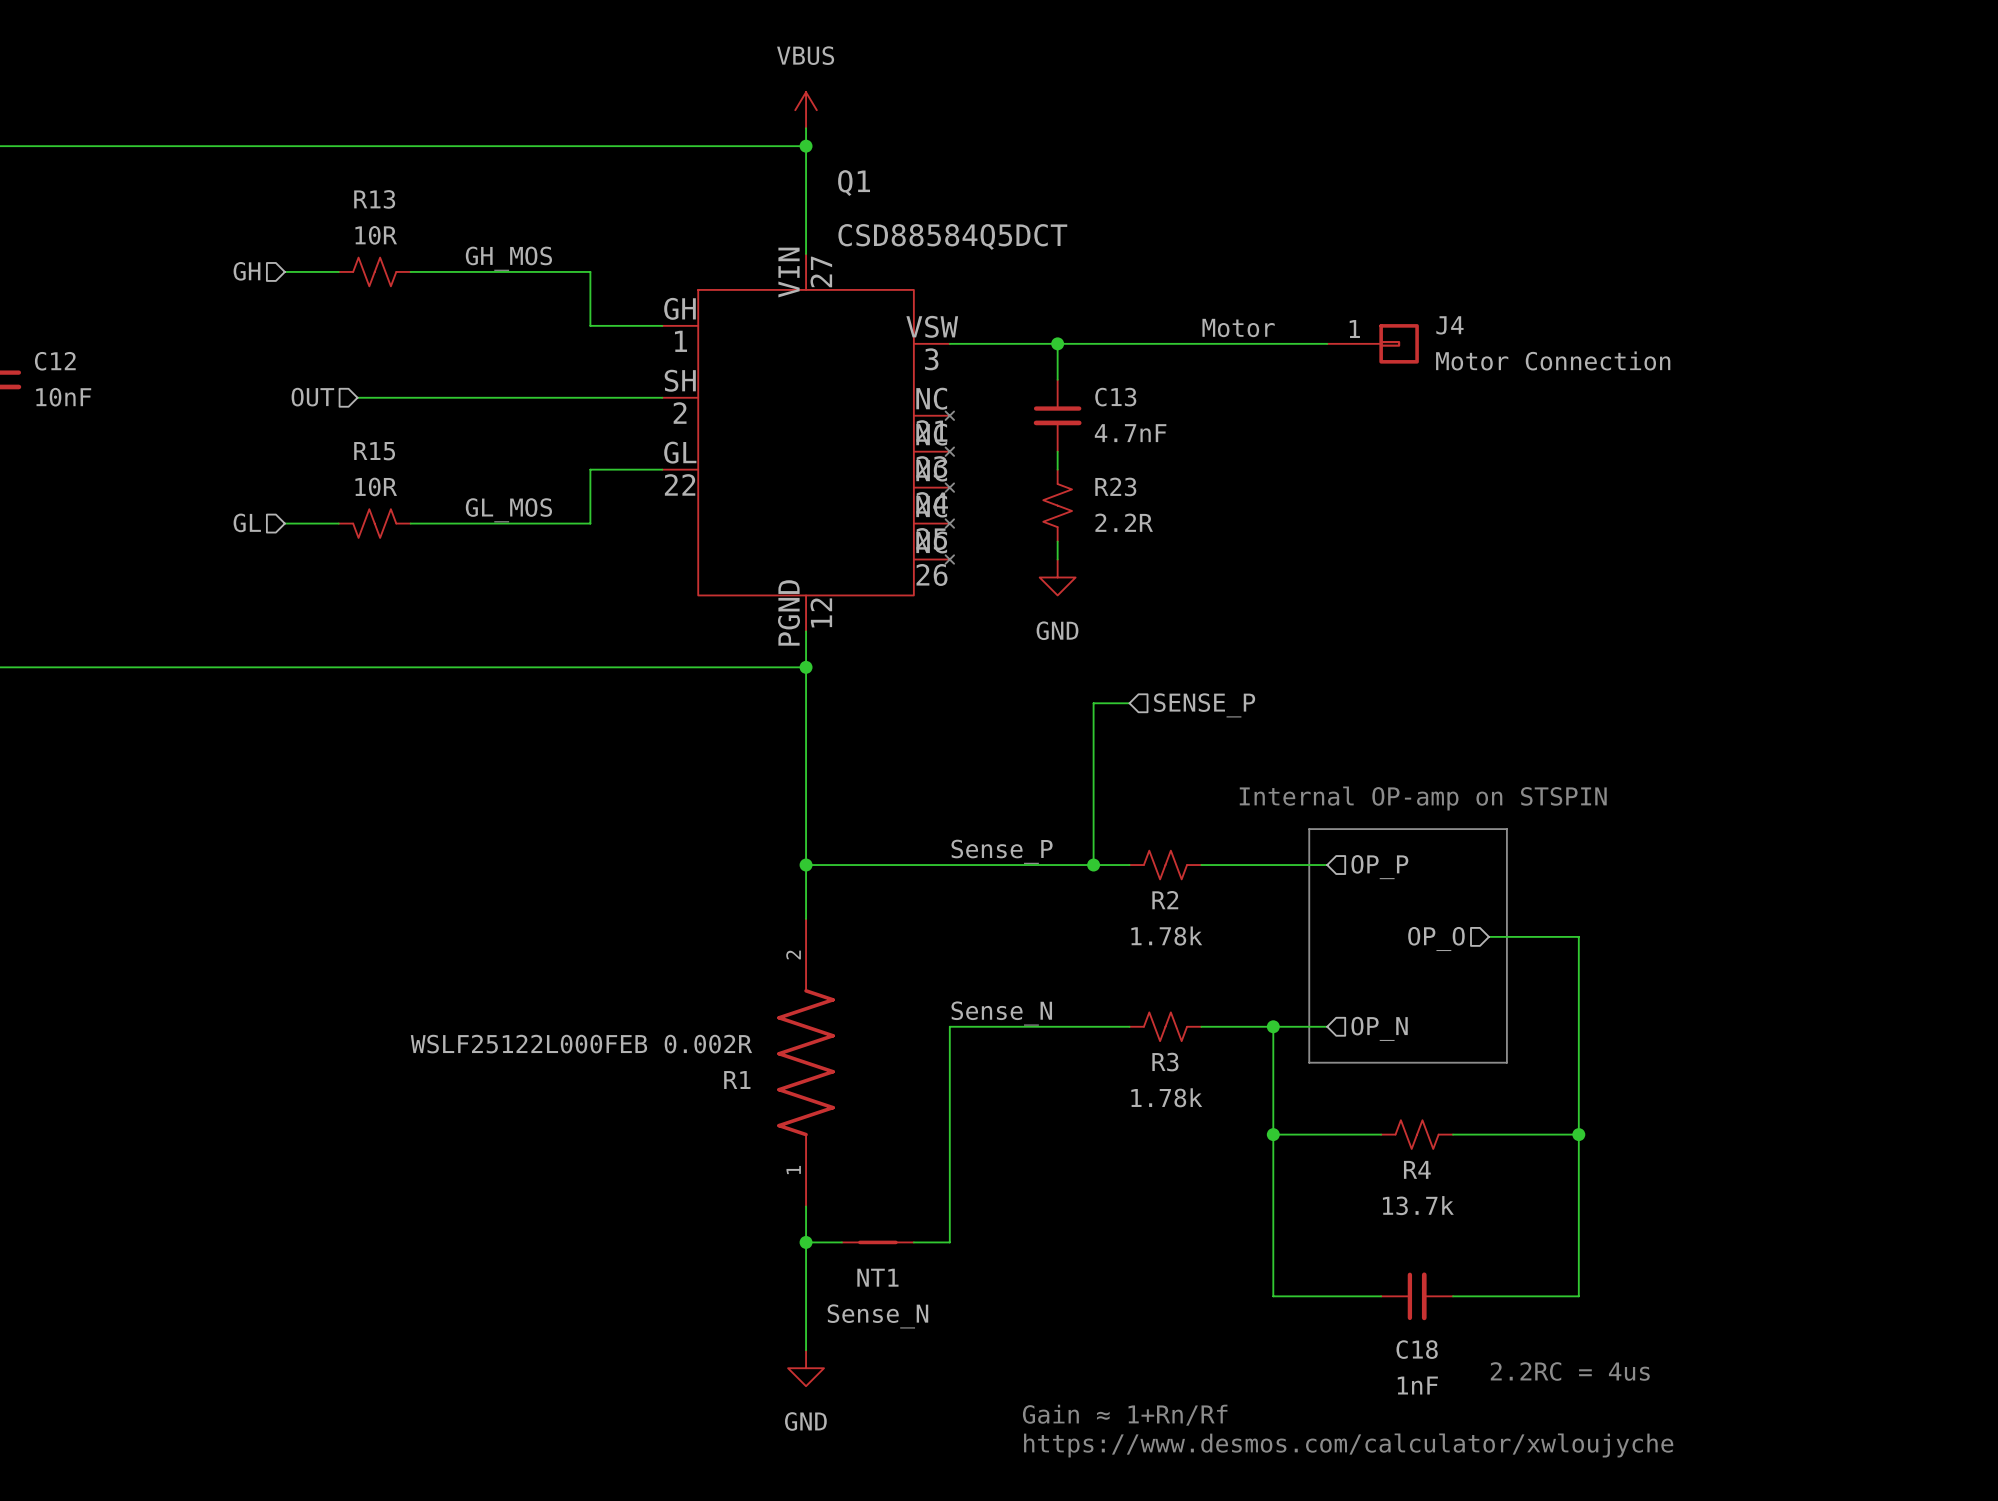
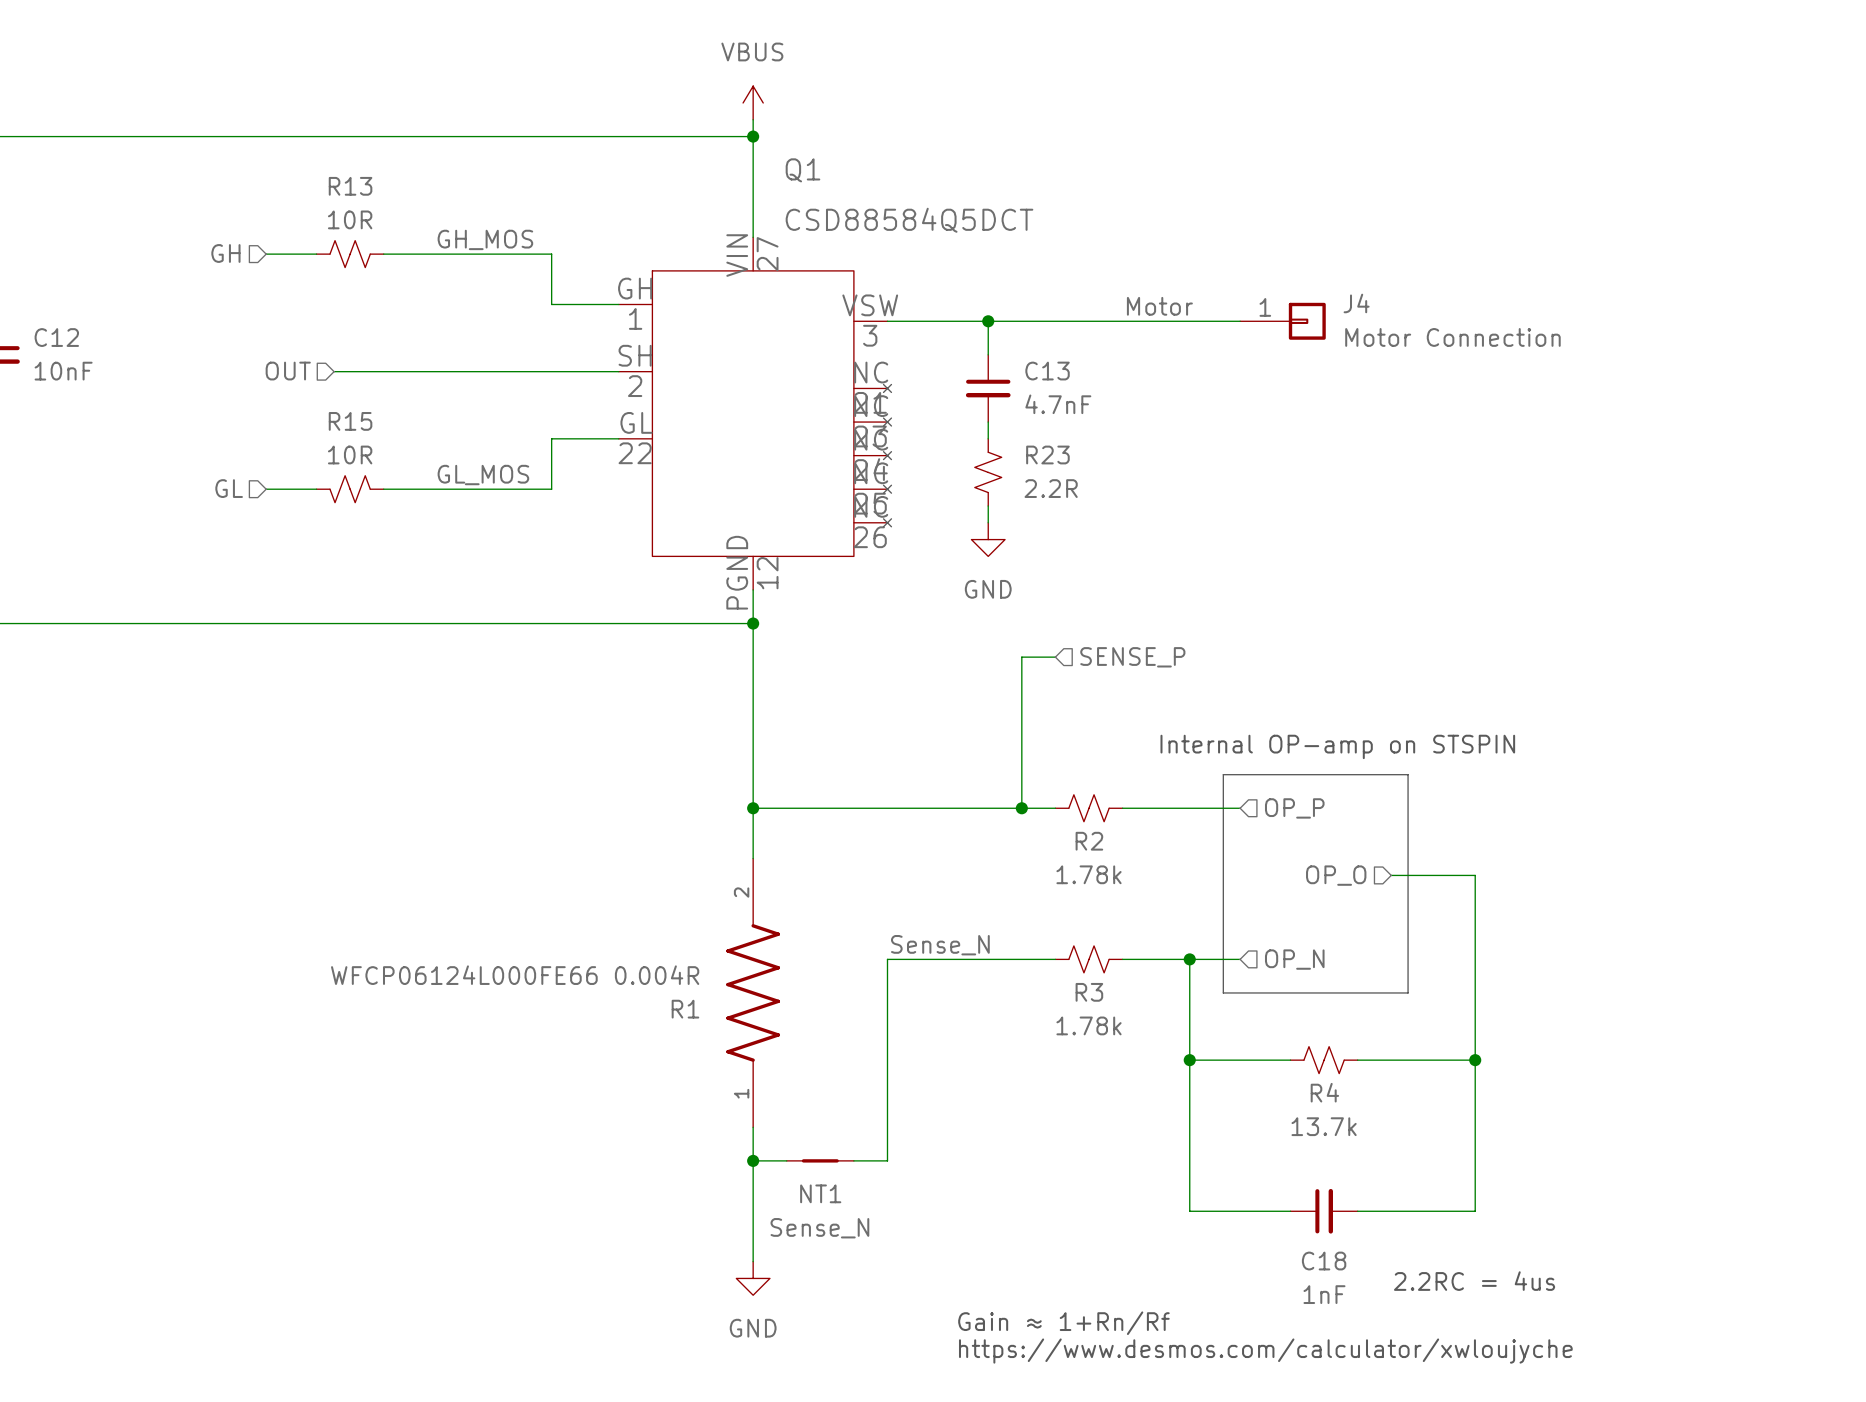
label: Sense_P (1002, 851) -> none
R1 value: WSLF25122L000FEB 0.002R (581, 1044) -> WFCP06124L000FE66 0.004R (515, 975)

